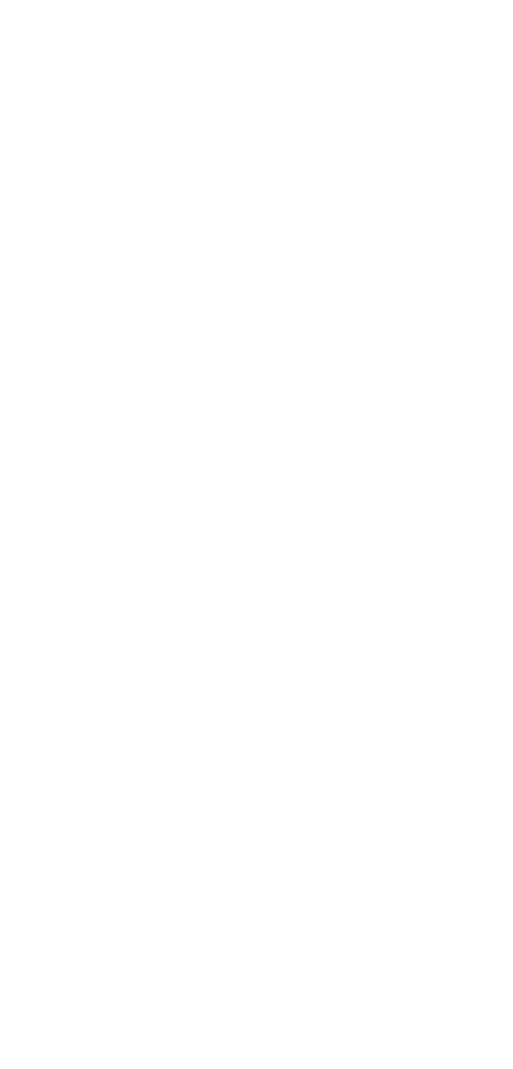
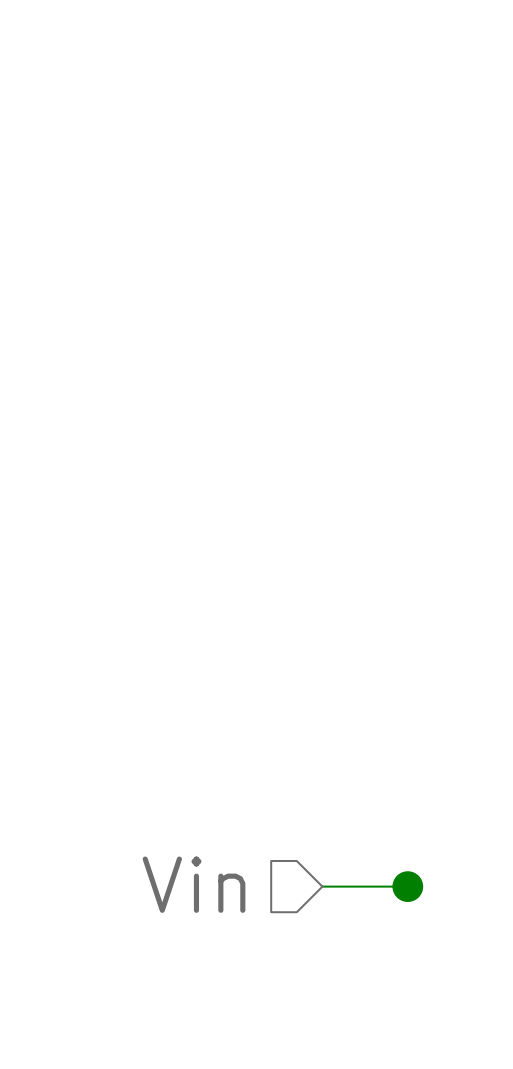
hierarchical label: none -> Vin (194, 884)
wire: none -> (322, 886) (407, 886)
junction: none -> (407, 886)

